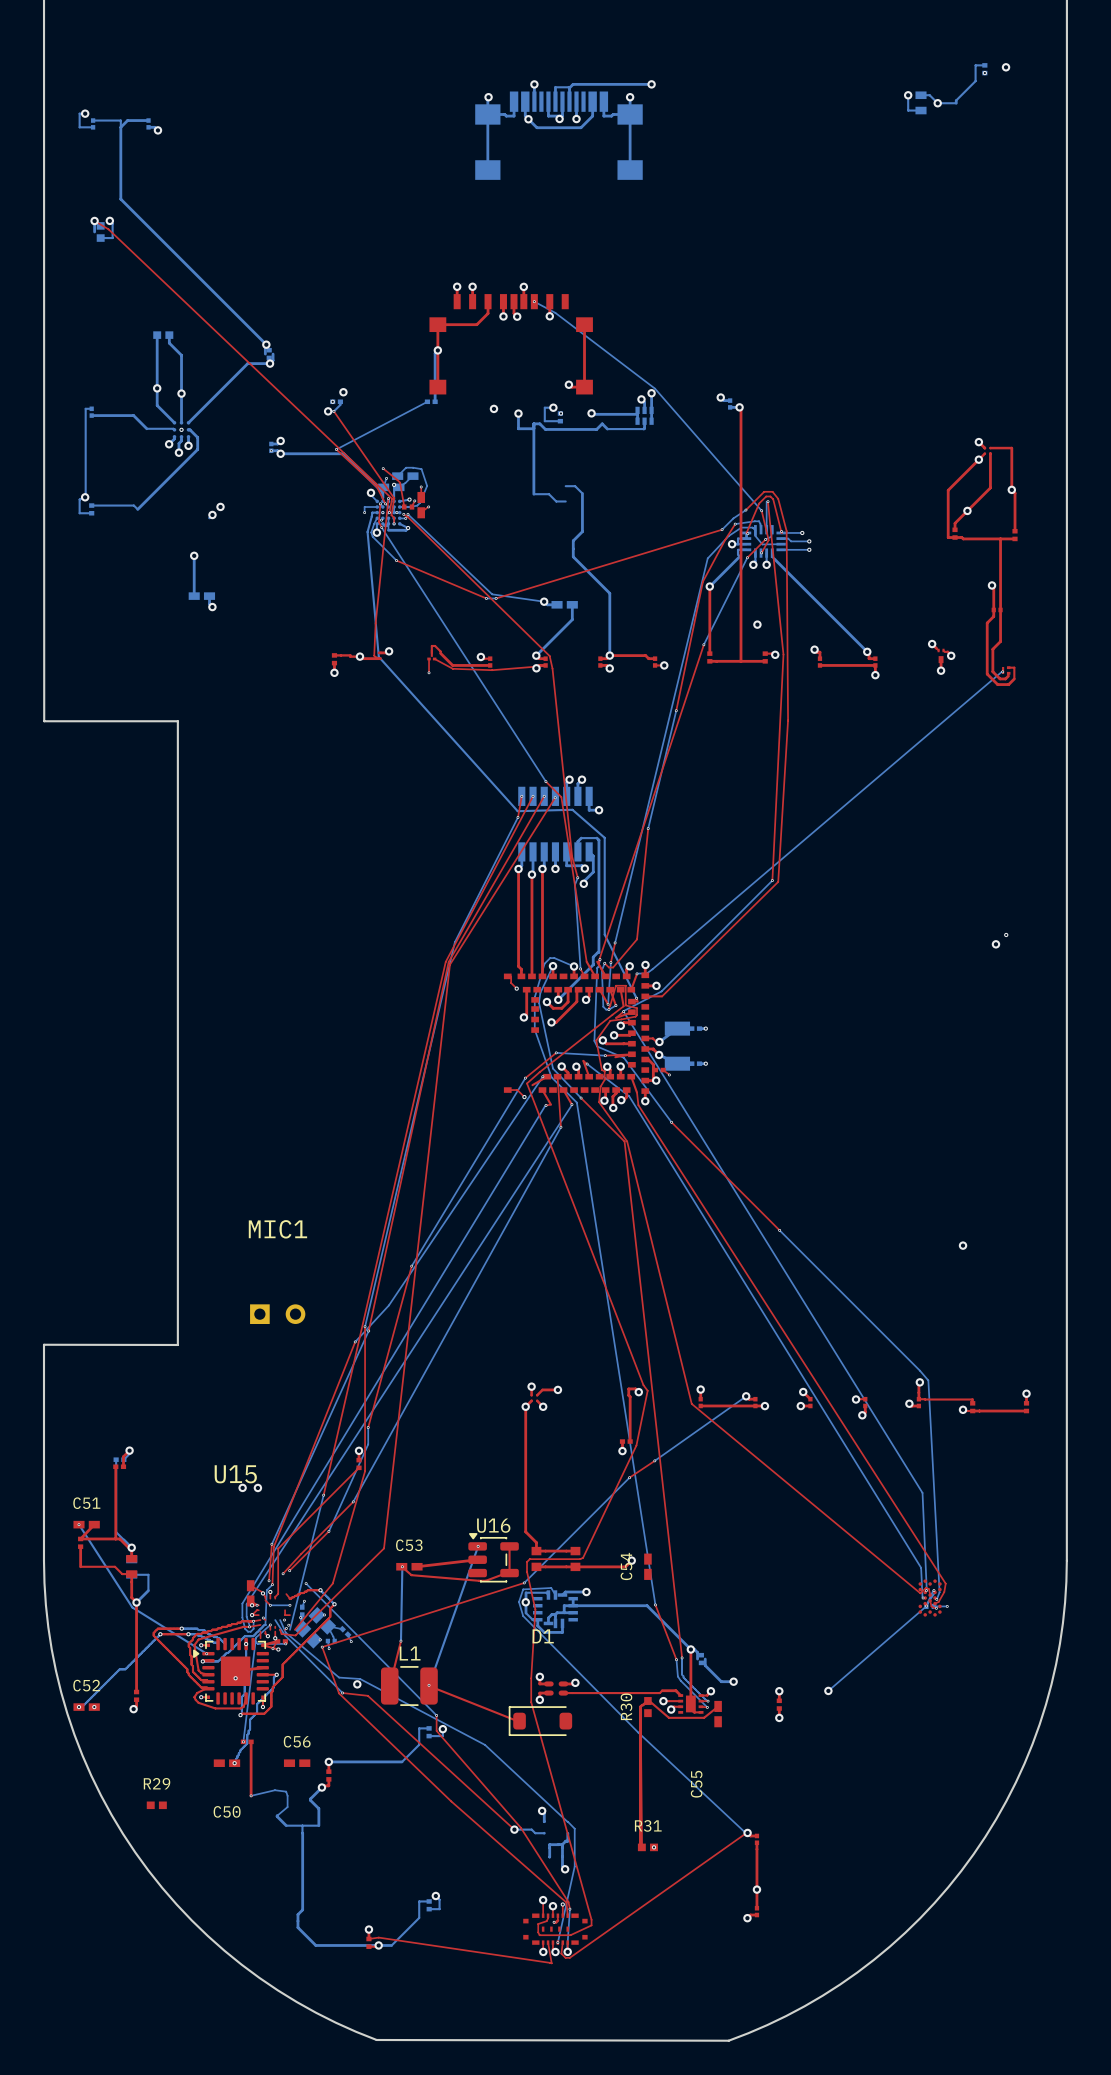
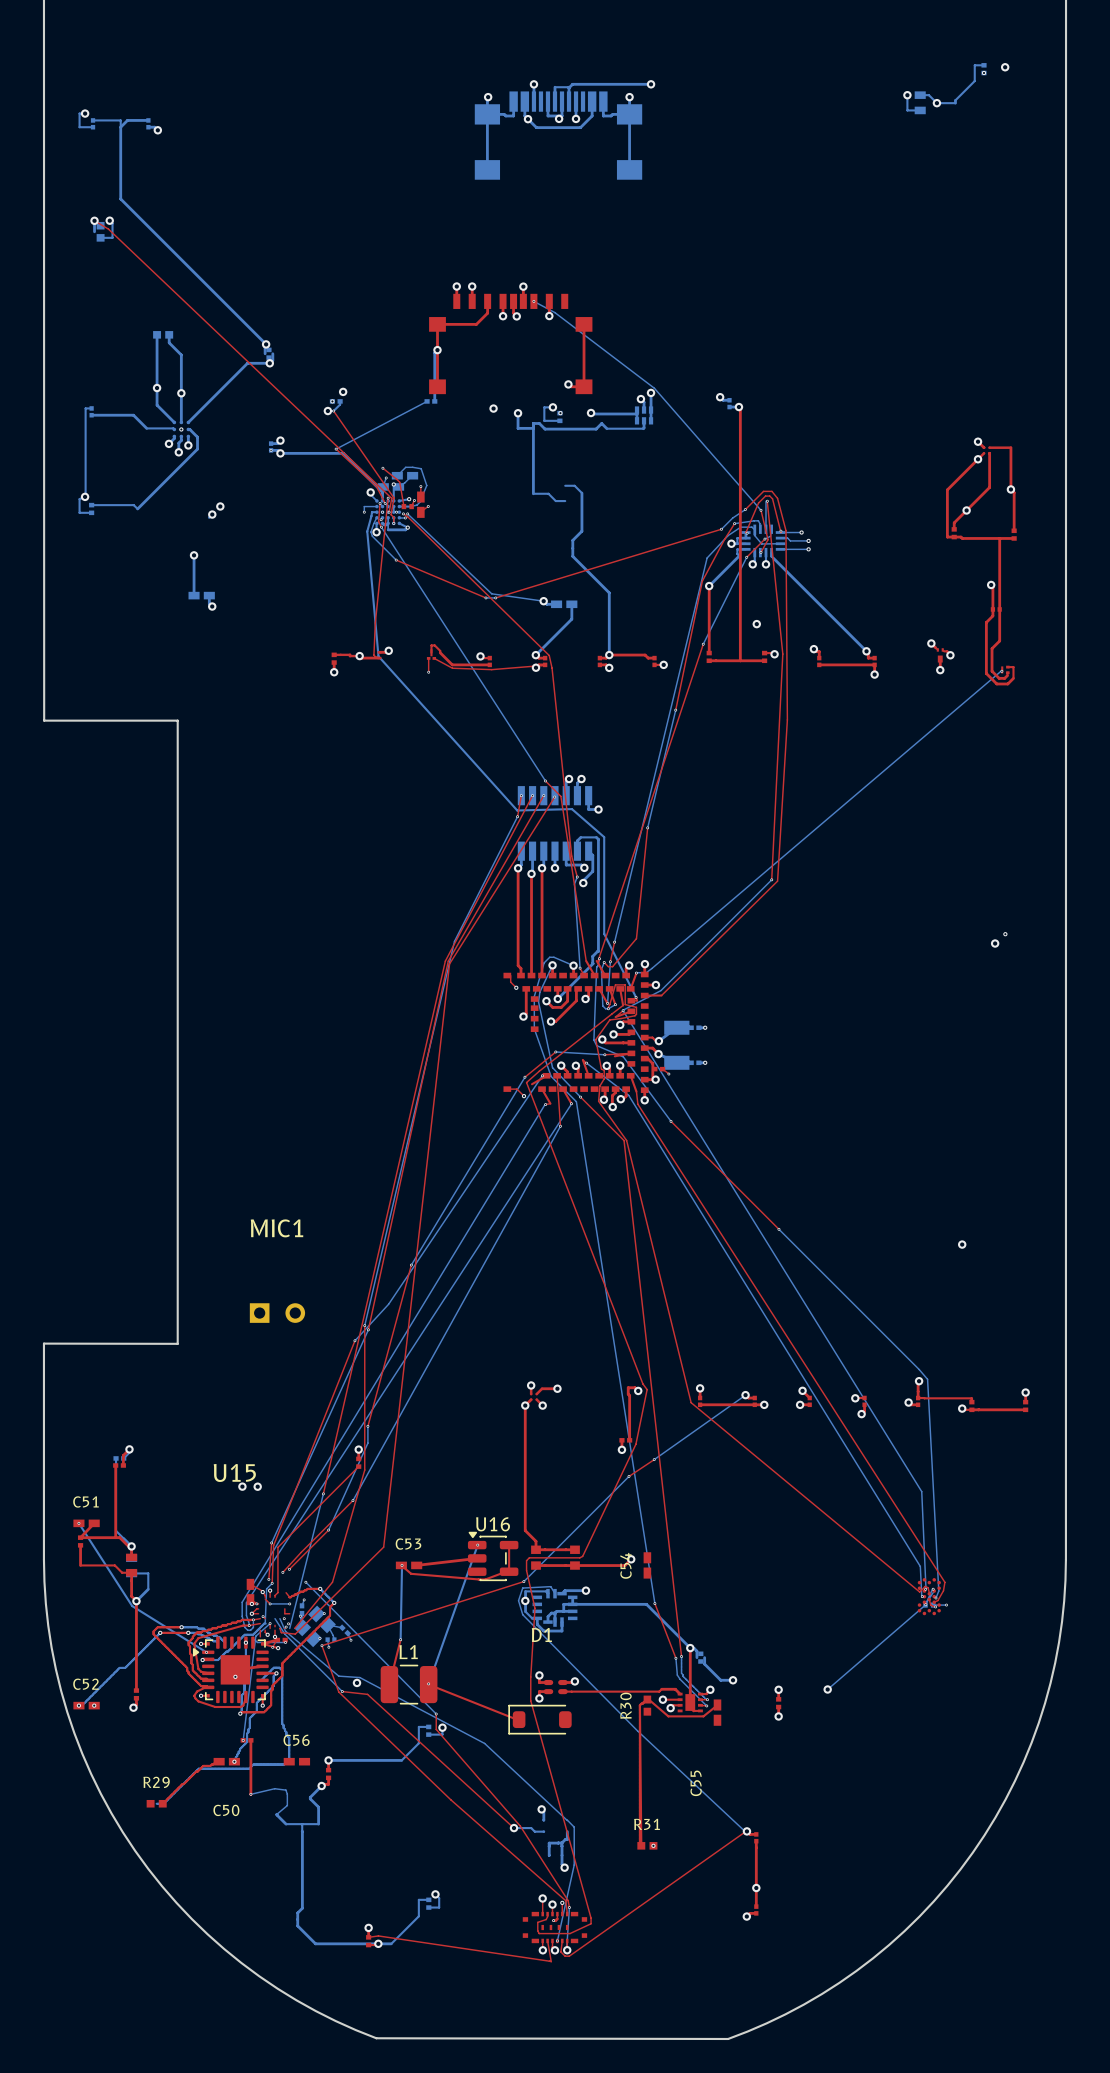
bottom track: none -> (262, 1680) (273, 1667) (279, 1667) (282, 1670) (282, 1723) (289, 1737) (289, 1761)
top track: none -> (219, 1761) (210, 1765) (203, 1765) (162, 1803)
bottom track: none -> (289, 1761) (284, 1764) (253, 1764) (249, 1768) (198, 1768) (163, 1803) (156, 1803)

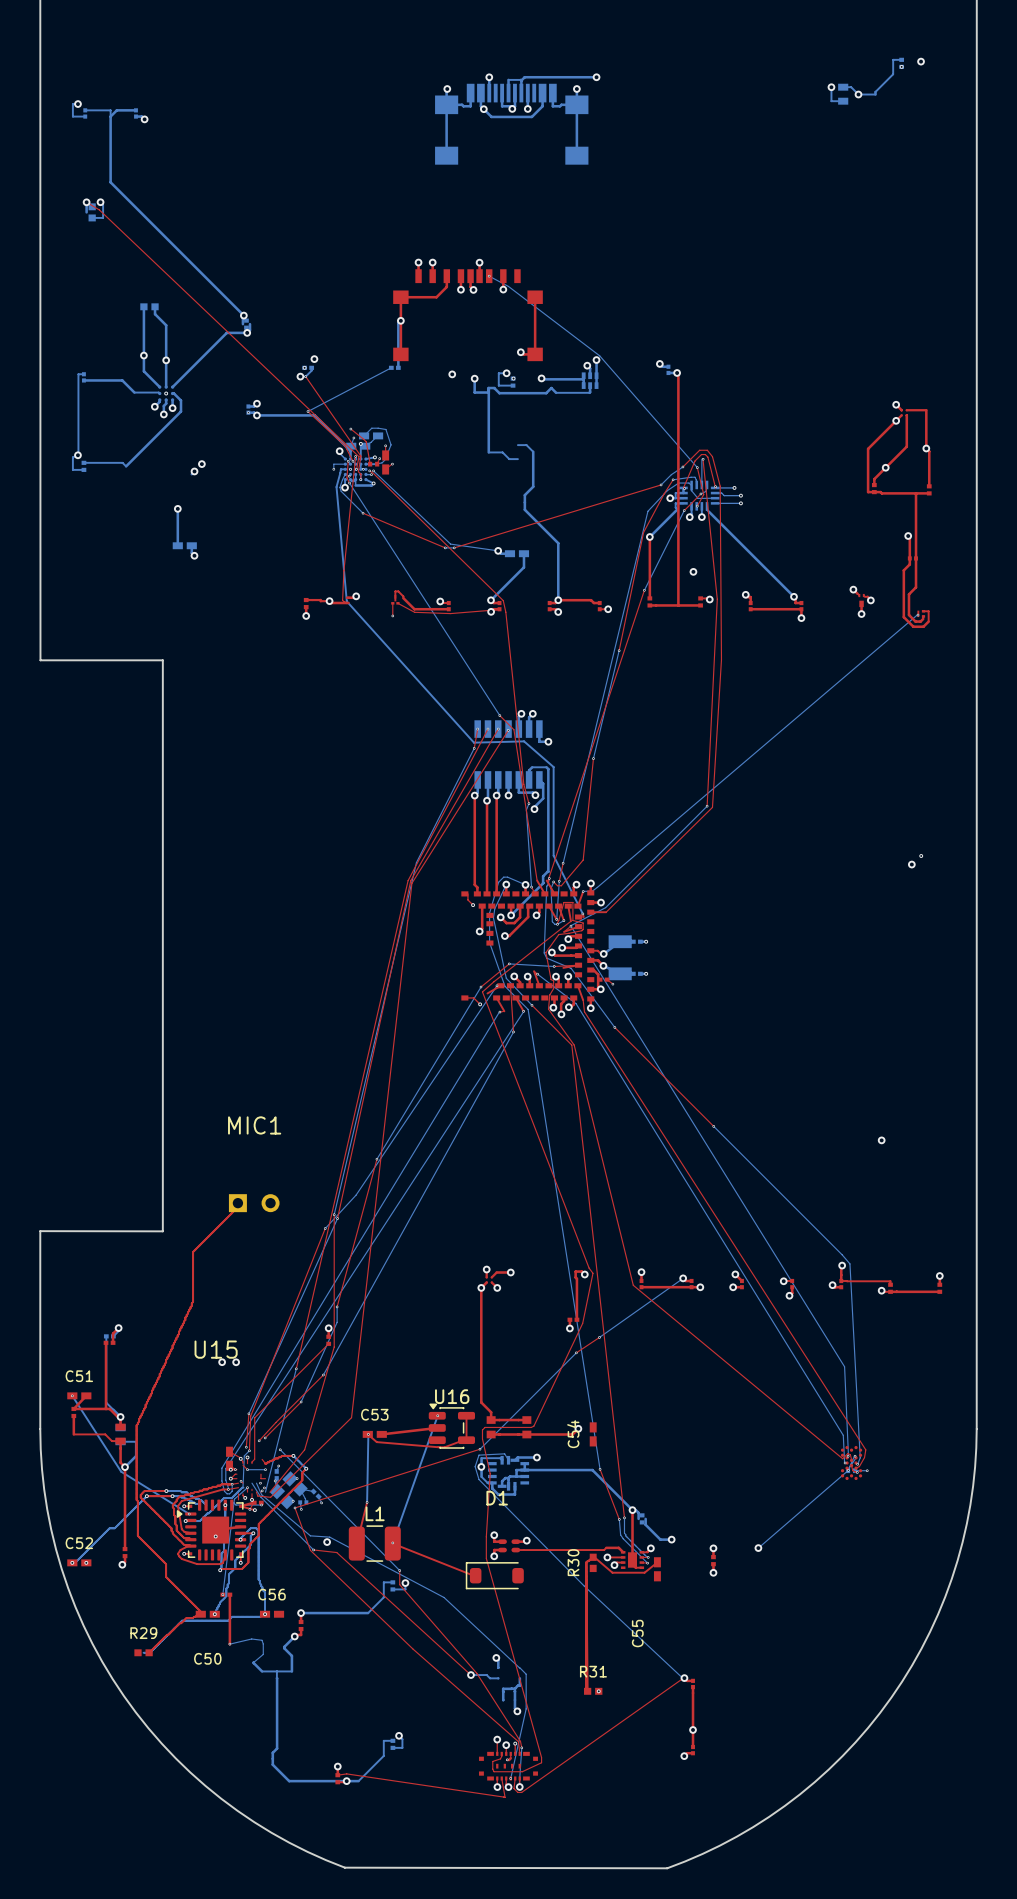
top track: none -> (238, 1203) (235, 1209) (193, 1251) (193, 1302) (136, 1425) (137, 1535) (166, 1564) (166, 1576) (200, 1611) (200, 1614)
via: none -> (240, 1539)
via: none -> (265, 1614)

